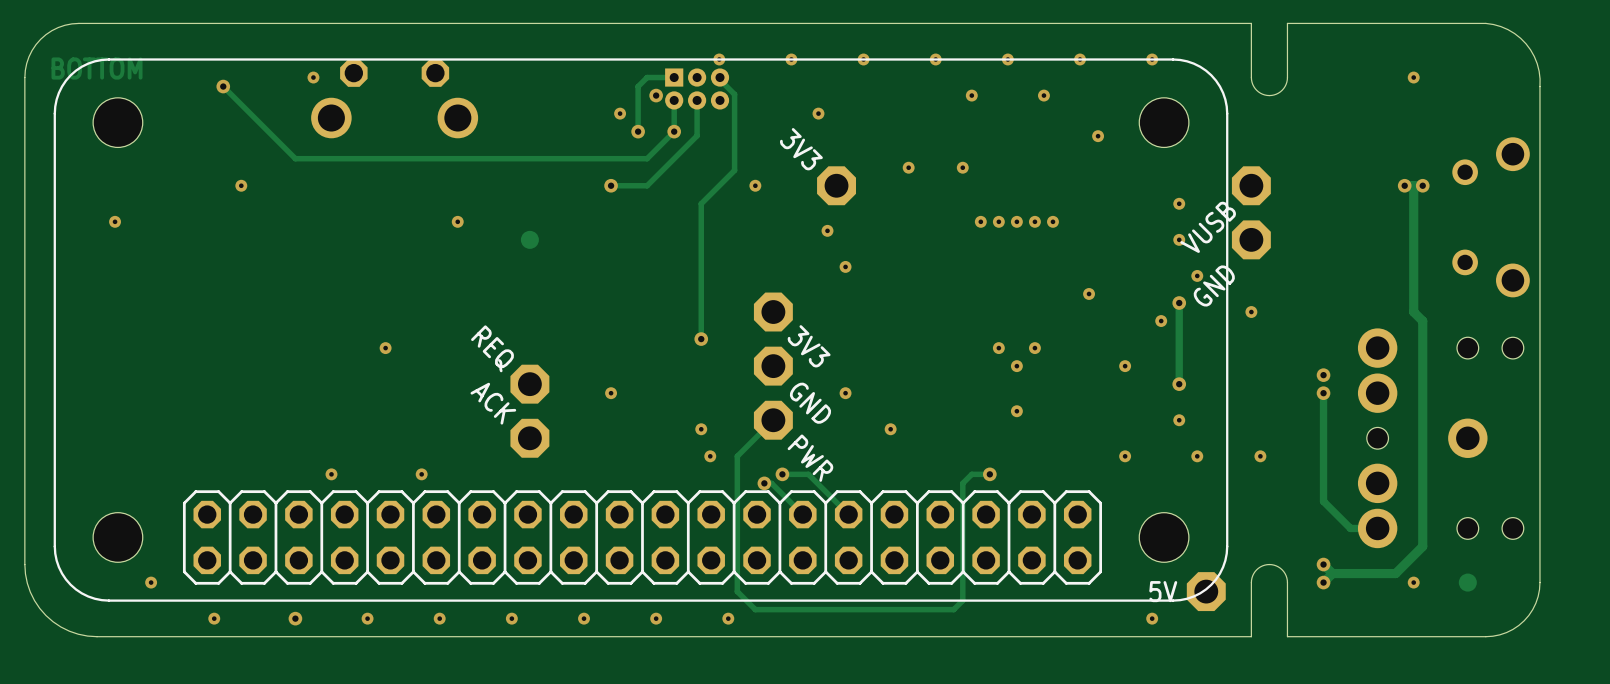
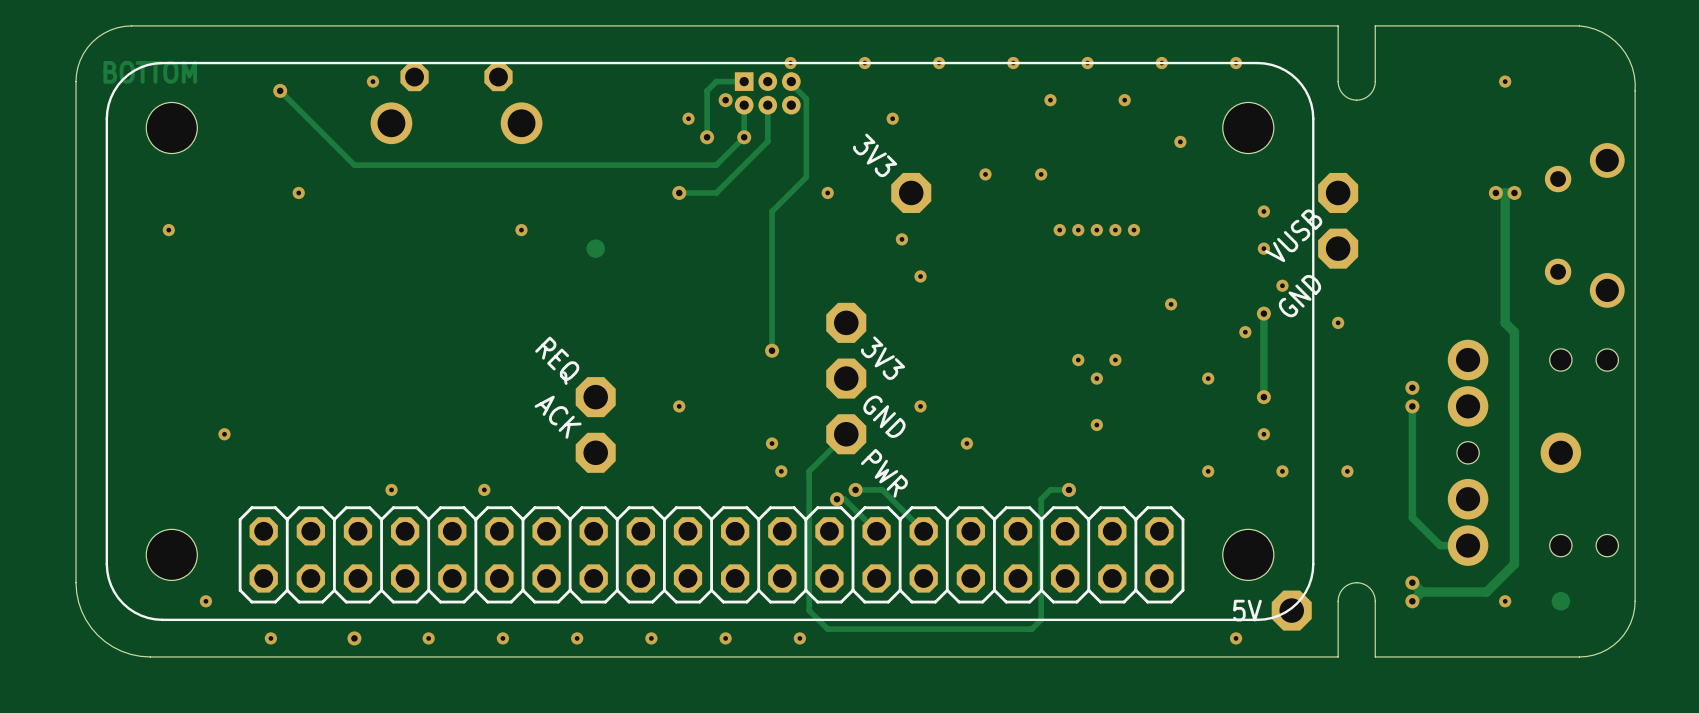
via: (385, 348) -> none
via: none -> (224, 434)

